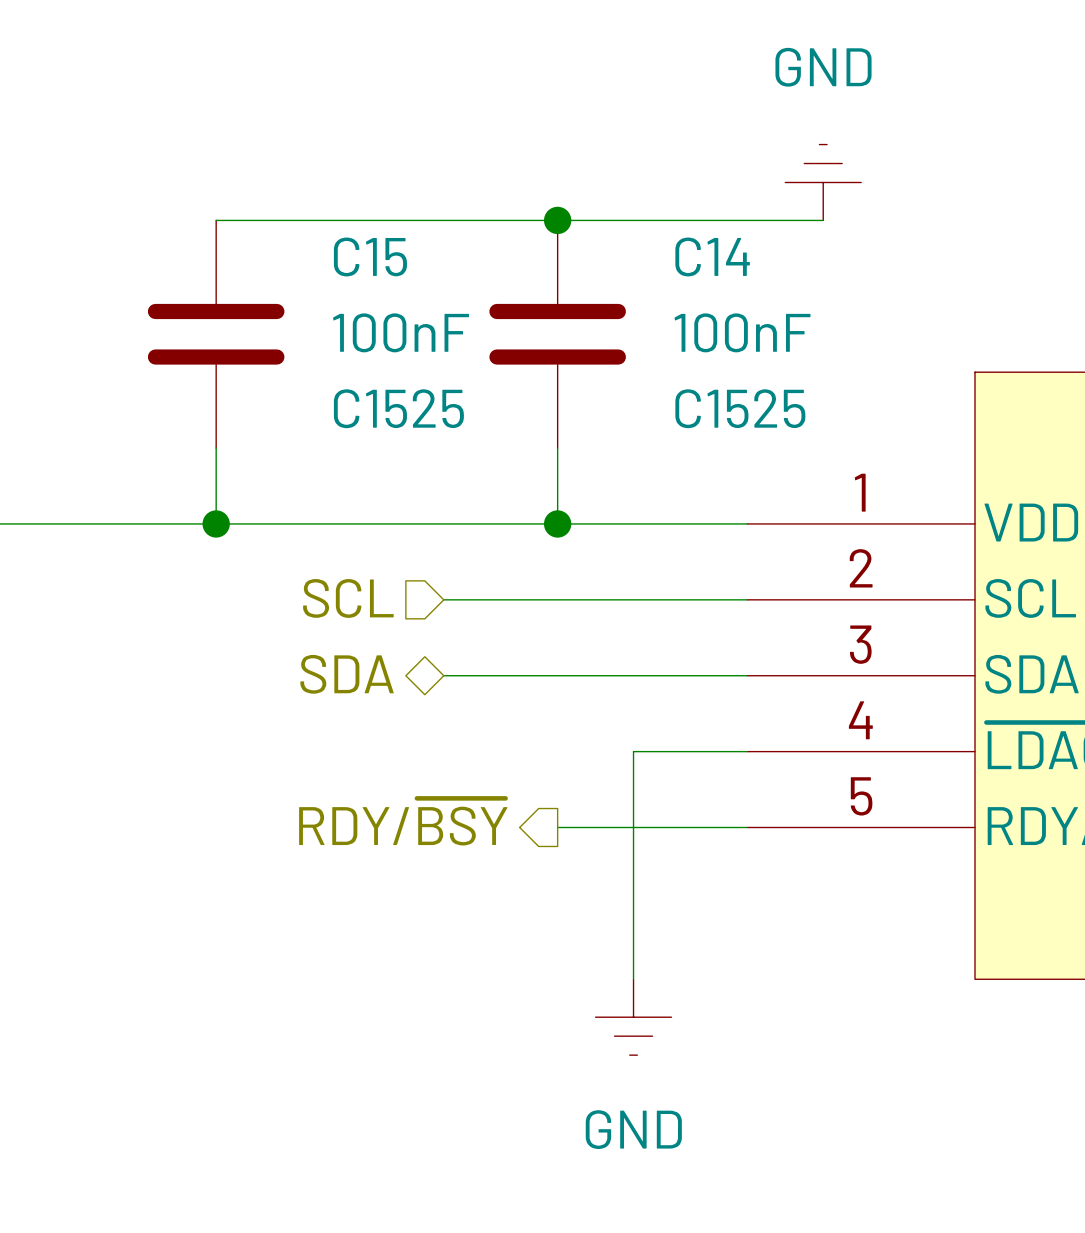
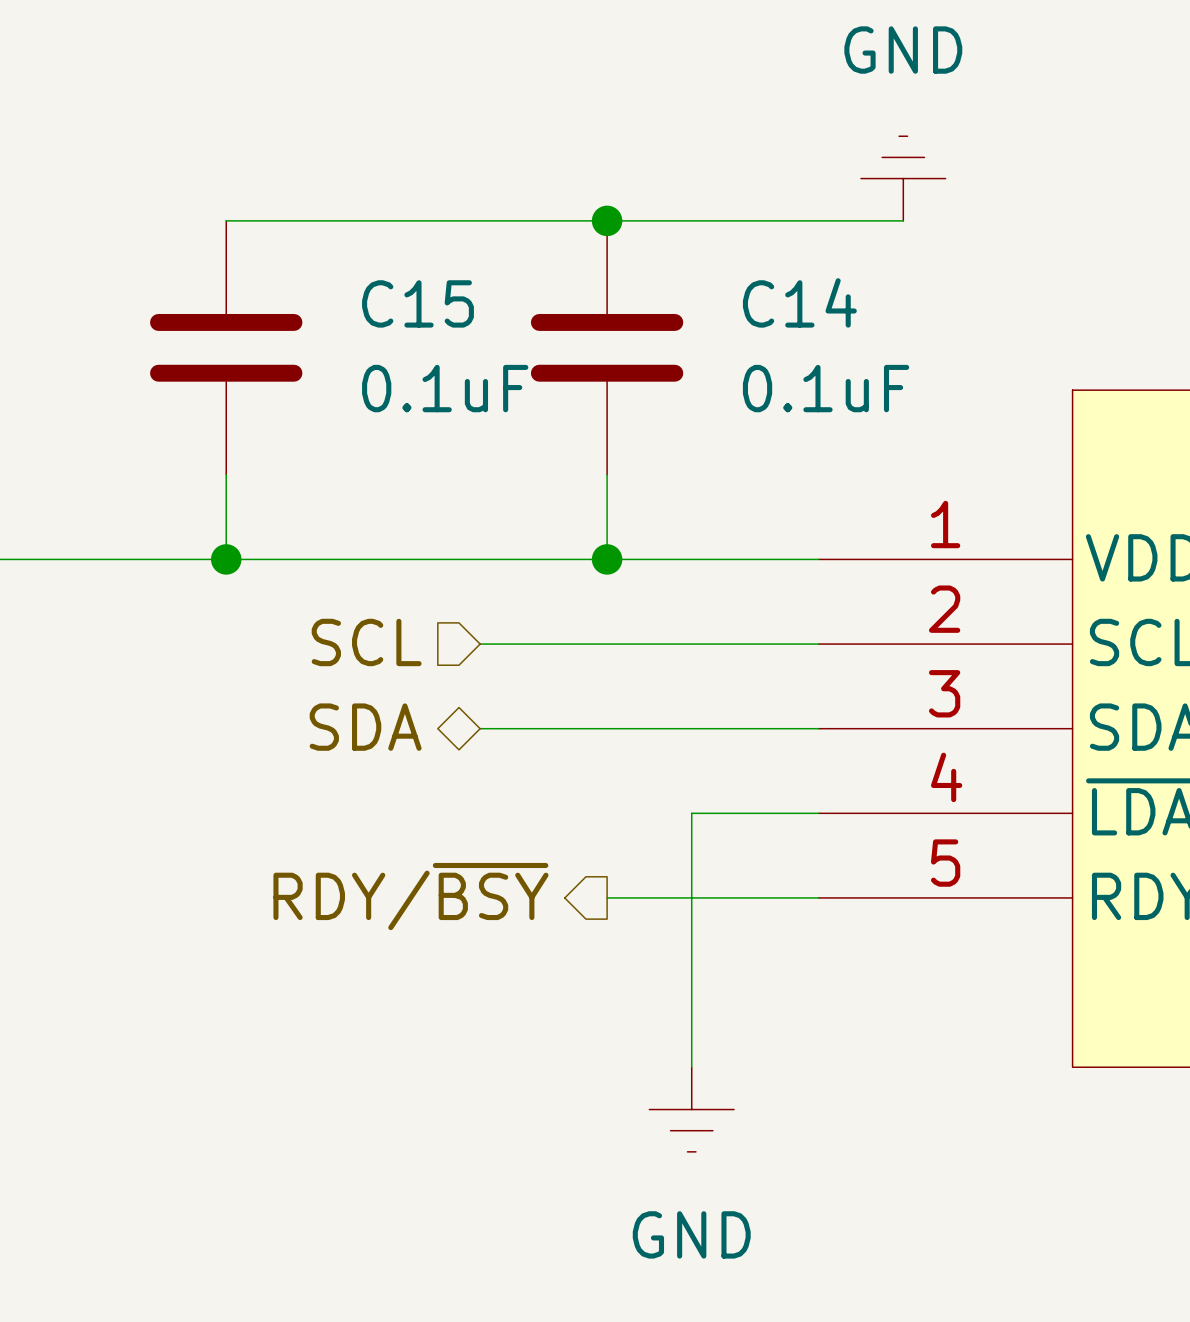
C15 name position: C15 (370, 256) -> C15 (417, 303)
C14 name position: C14 (712, 256) -> C14 (799, 302)
C15 value: 100nF (401, 332) -> 0.1uF (445, 388)
C14 value: 100nF (742, 332) -> 0.1uF (826, 388)
C15 text: C1525 (398, 408) -> none
C14 text: C1525 (740, 408) -> none

